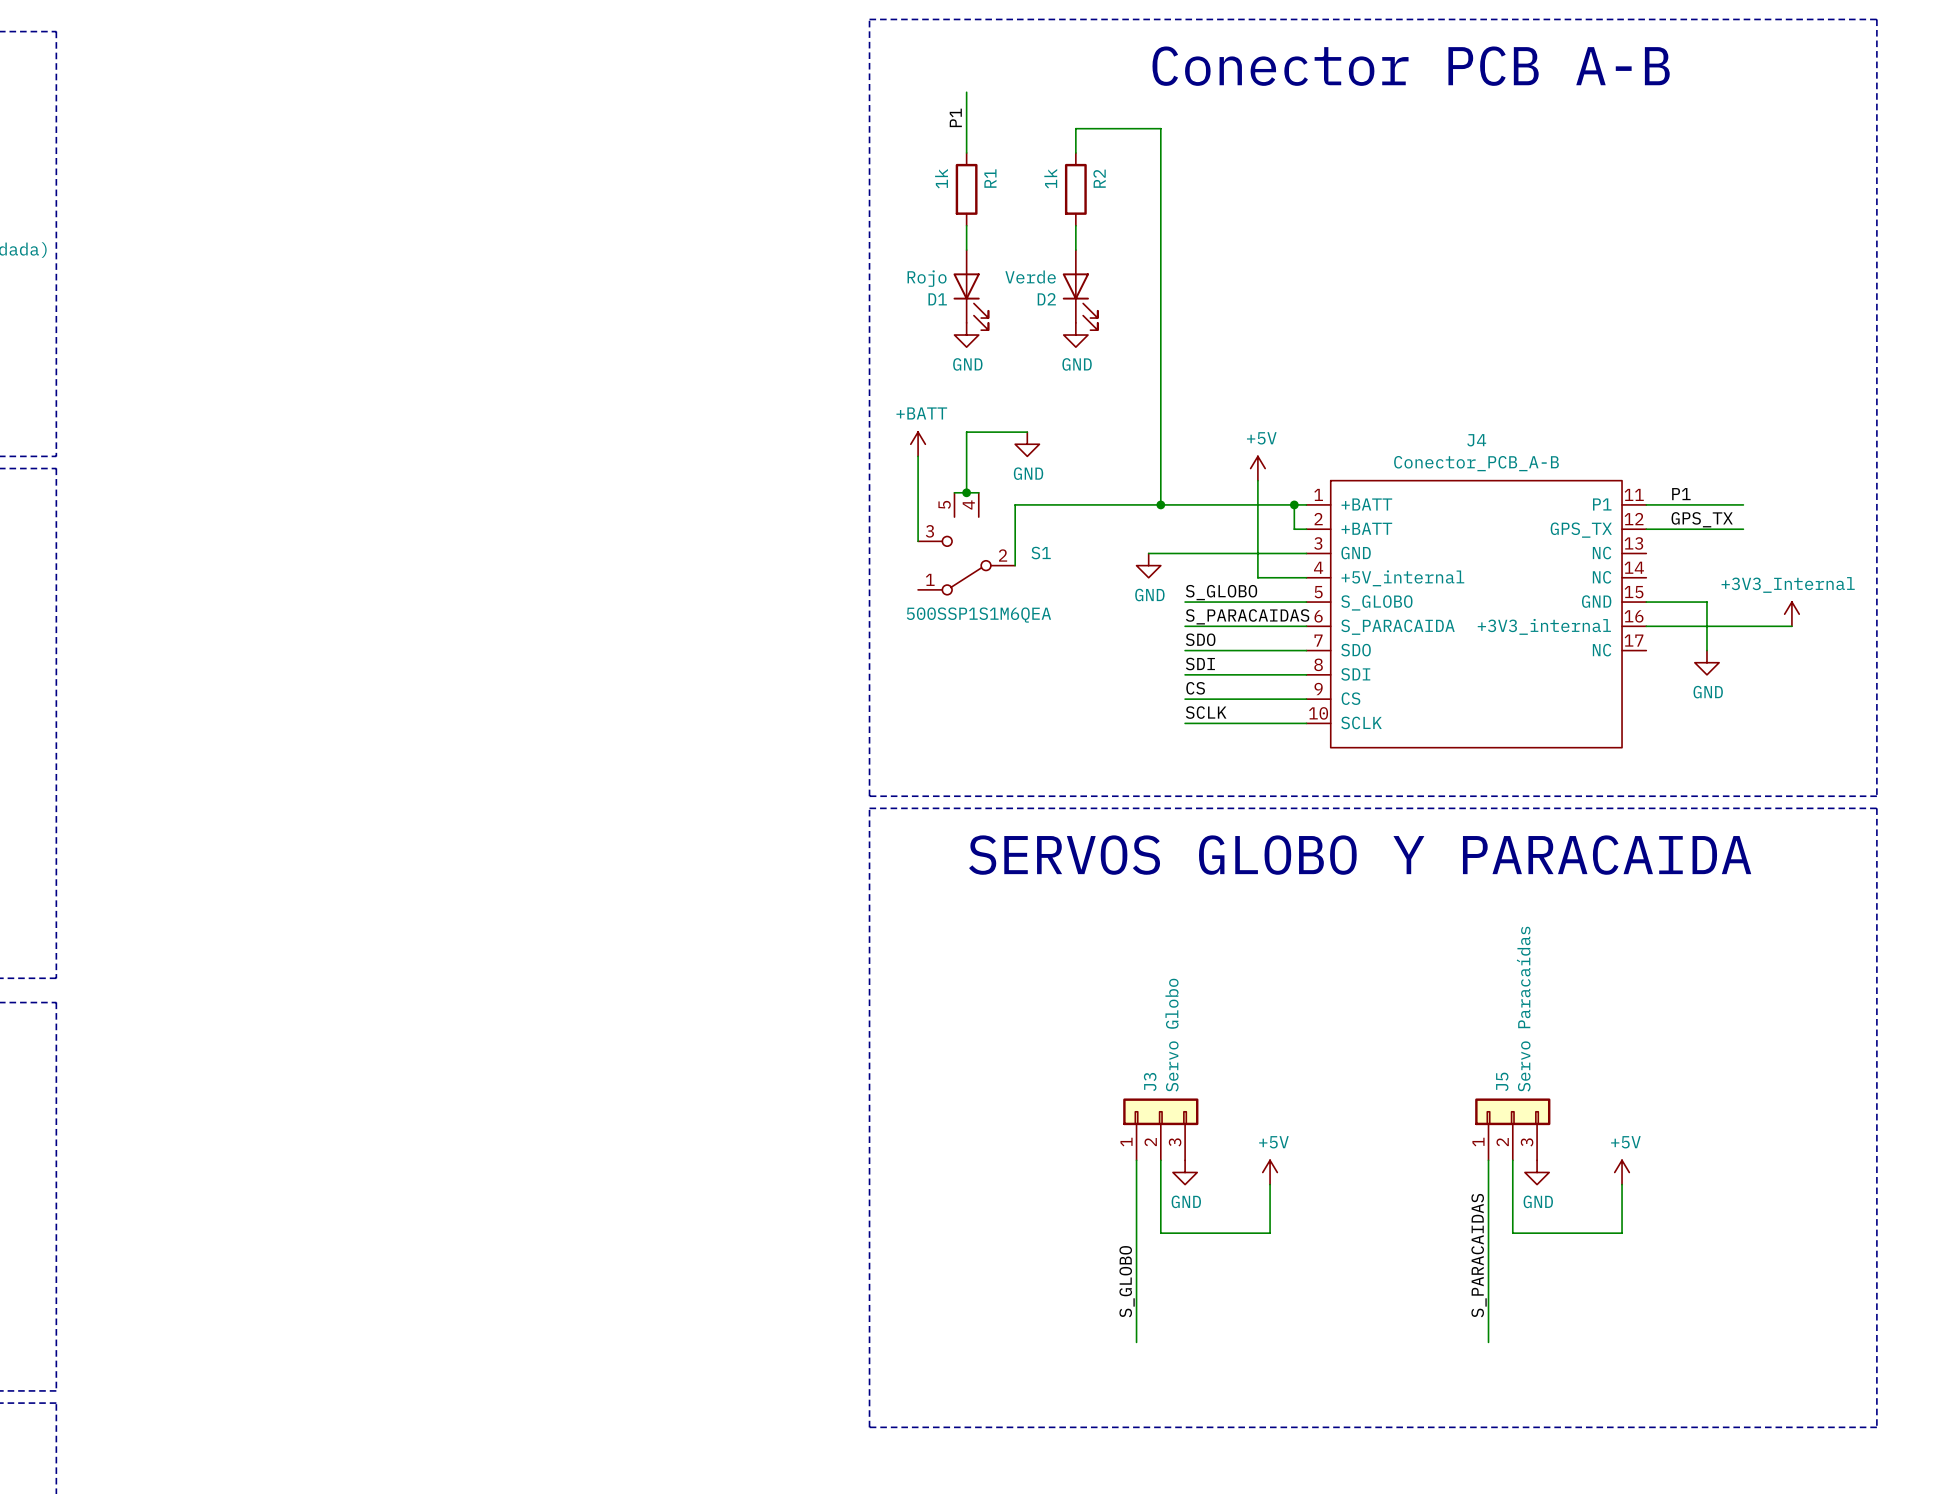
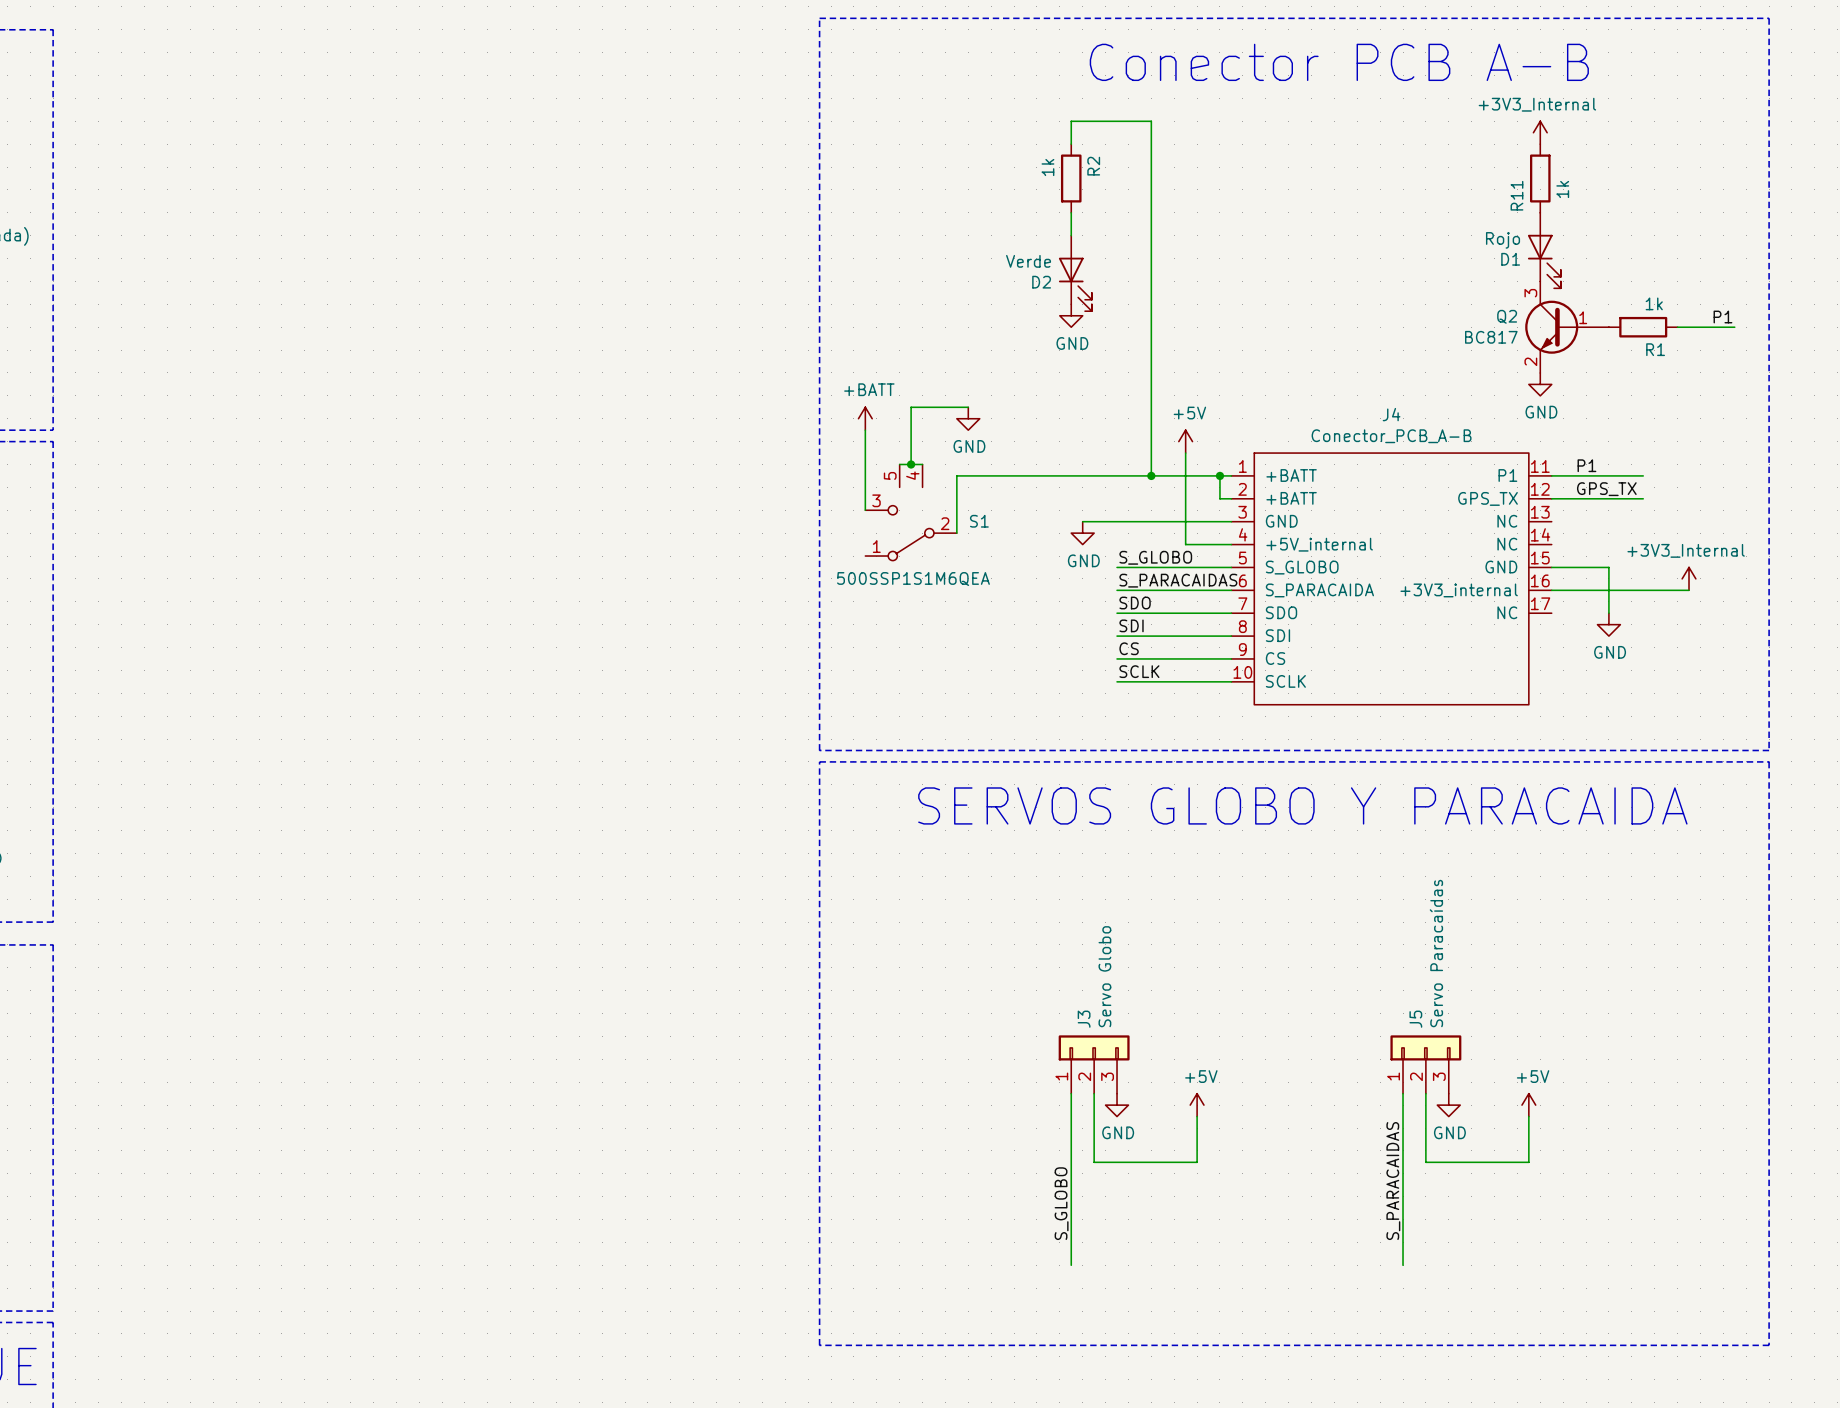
wire: (966, 92) (966, 152) -> none
label: P1 (955, 117) -> none
wire: (1136, 128) (1075, 128) (1075, 152) -> (1071, 121) (1071, 144)
wire: (1160, 128) (1160, 504) -> (1094, 121) (1151, 121) (1151, 475)
power symbol: none -> +3V3_Internal (1540, 132)
R1 rotation: 0° (966, 189) -> 90° clockwise (1643, 327)
R1 position: (966, 189) -> (1643, 327)
R2 position: (1075, 189) -> (1071, 178)
R11: none -> 1k (1540, 178)
wire: (966, 225) (966, 250) -> none
wire: (1075, 225) (1075, 250) -> (1071, 212) (1071, 235)
D1 position: (970, 290) -> (1544, 250)
D2 position: (1080, 290) -> (1075, 273)
power symbol: GND (966, 335) -> none
power symbol position: GND (1075, 335) -> GND (1071, 315)
label: none -> P1 (1722, 317)
Q2: none -> BC817 (1567, 327)
wire: none -> (1677, 327) (1734, 327)
power symbol: none -> GND (1540, 384)
junction: (1160, 504) -> none
junction: none -> (1151, 475)

